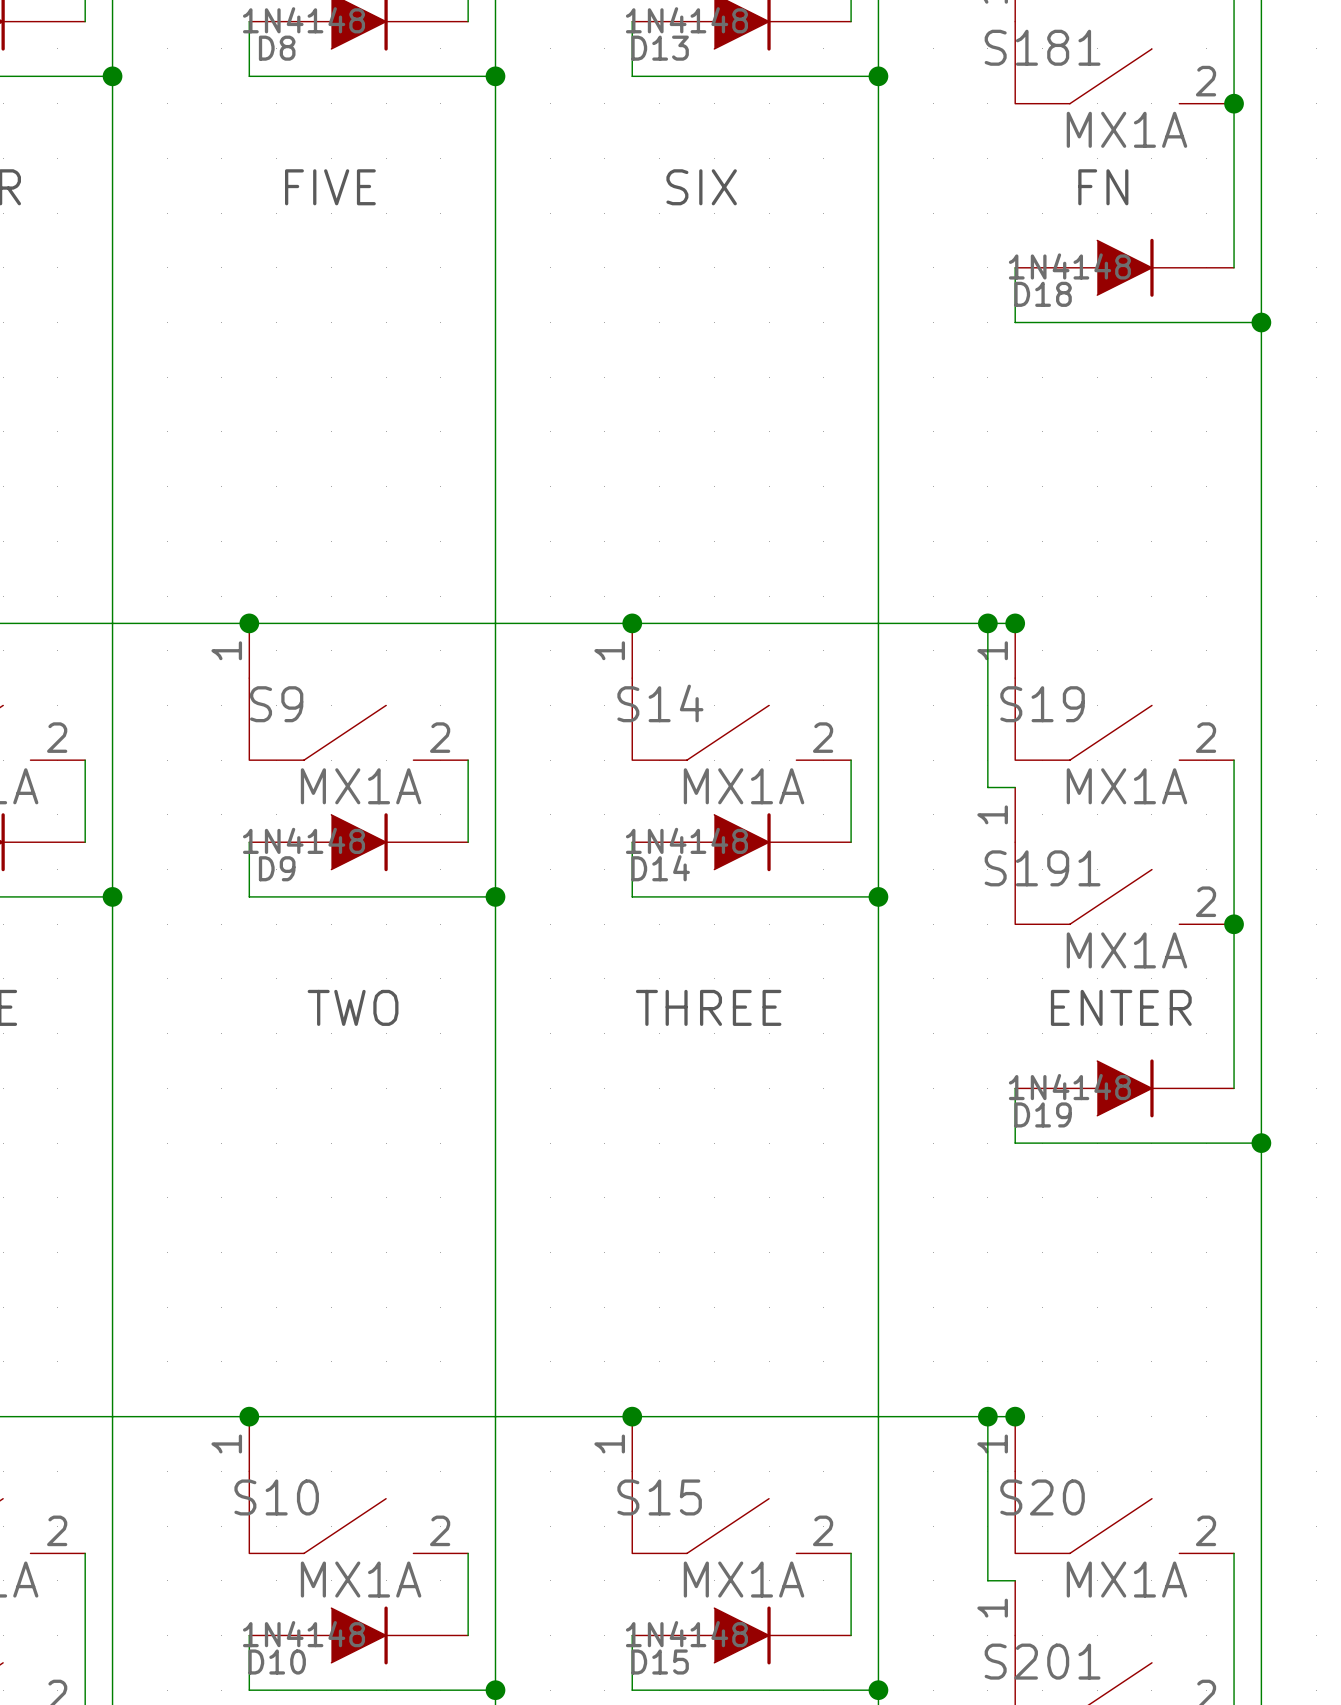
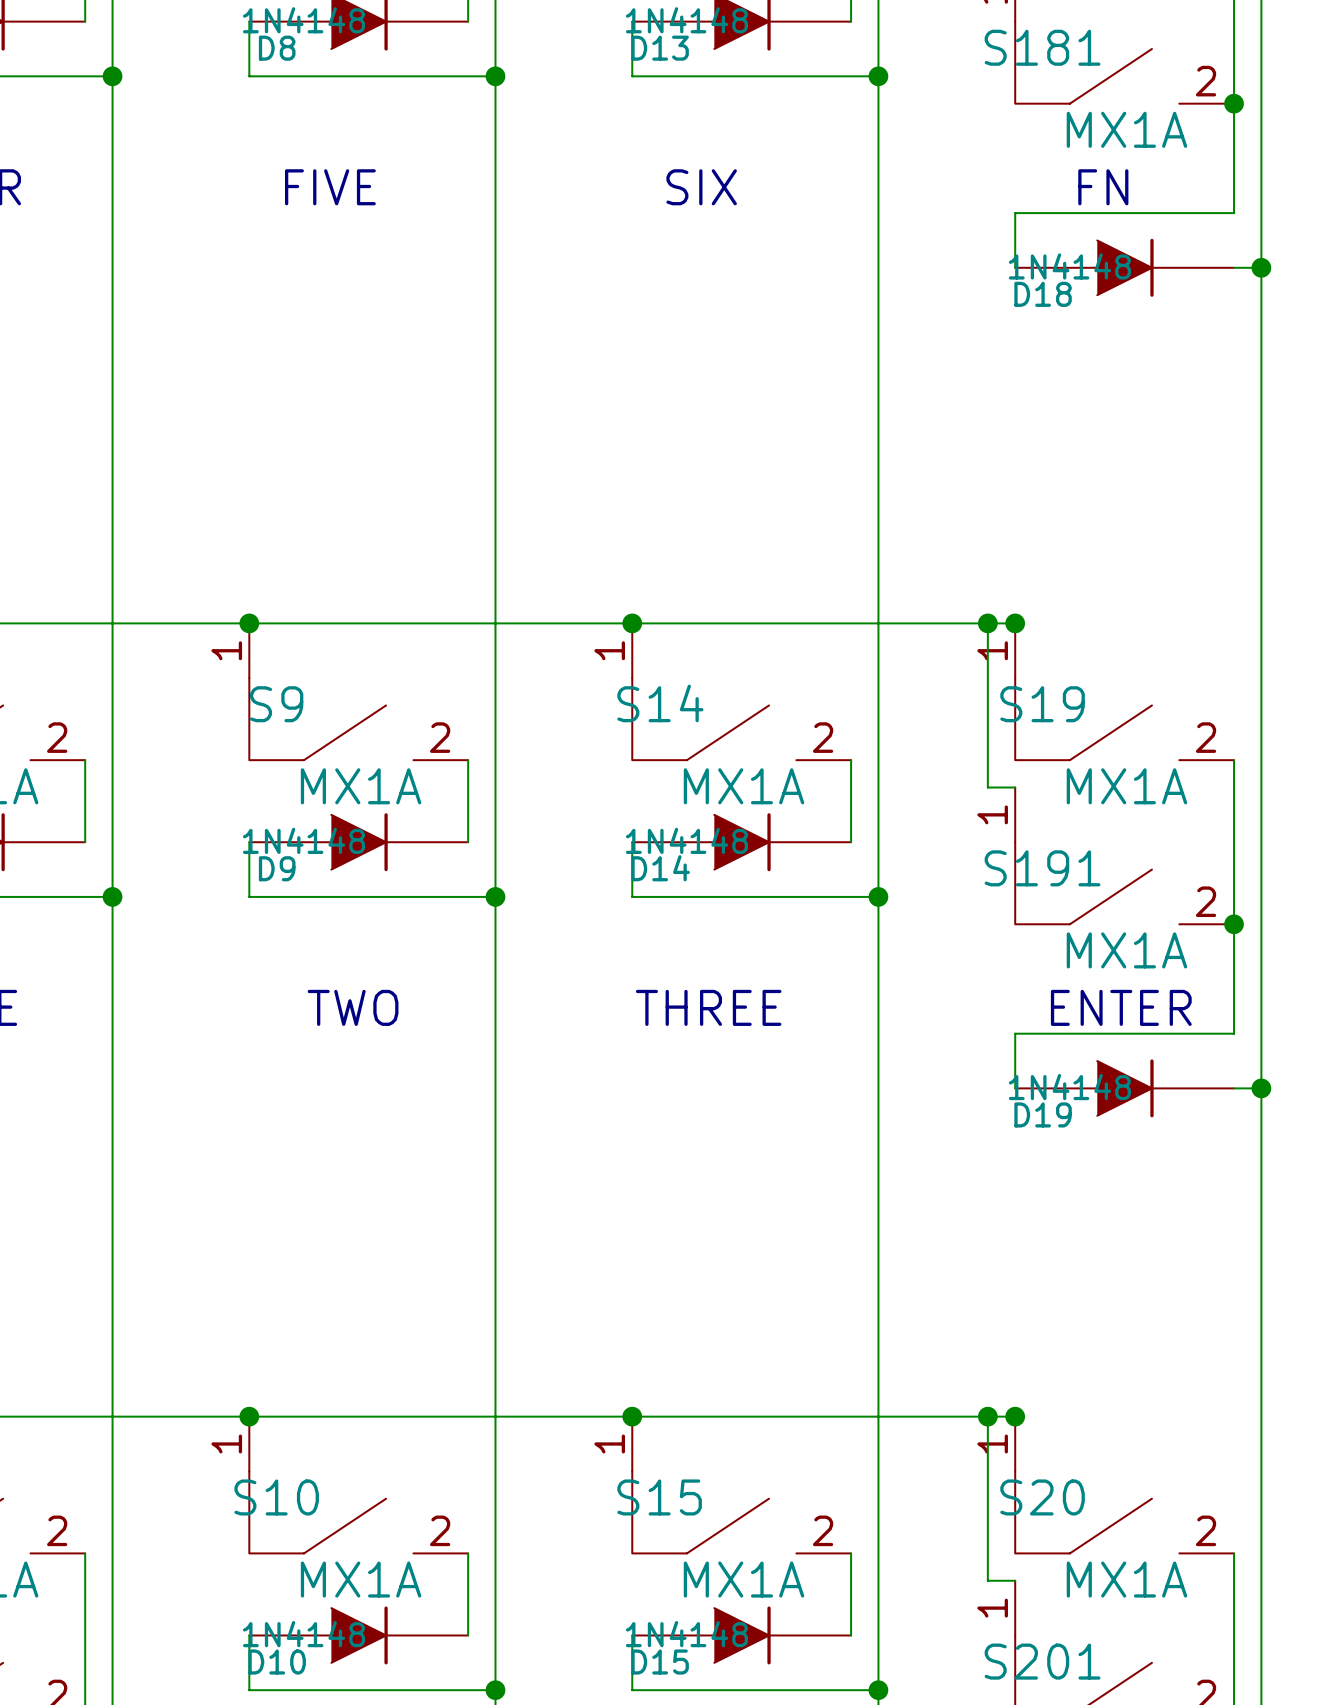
wire: (1234, 213) (1234, 267) -> (1261, 267) (1234, 267)
wire: (1015, 267) (1015, 322) (1261, 322) -> (1015, 267) (1015, 213) (1234, 213)
junction position: (1261, 322) -> (1261, 267)
wire: (1234, 1033) (1234, 1088) -> (1261, 1088) (1234, 1088)
wire: (1015, 1088) (1015, 1143) (1261, 1143) -> (1015, 1088) (1015, 1033) (1234, 1033)
junction position: (1261, 1143) -> (1261, 1088)

